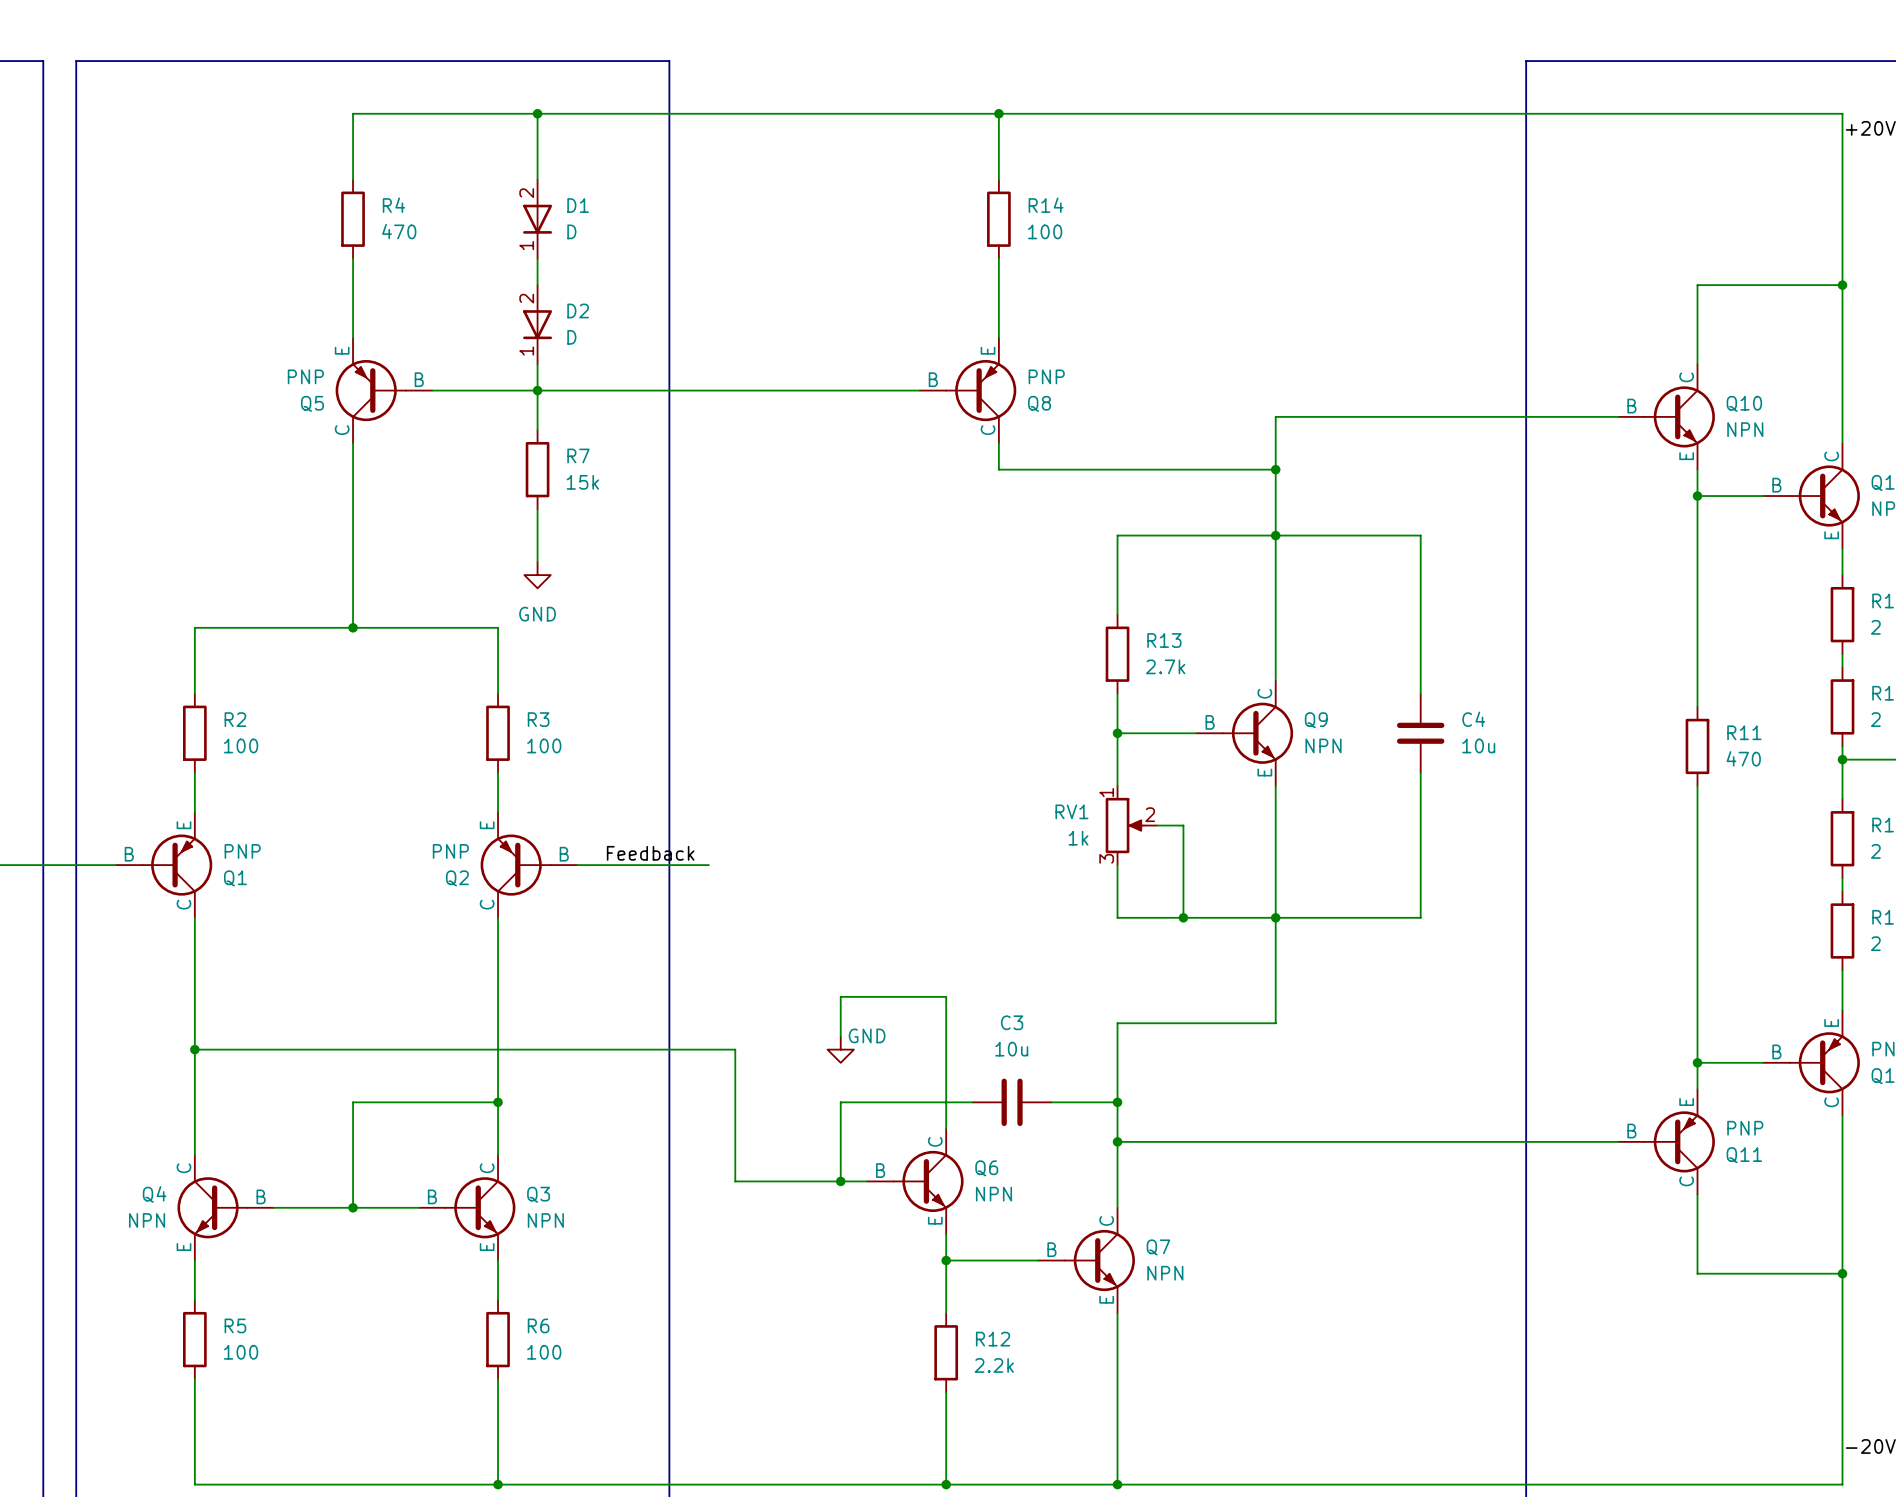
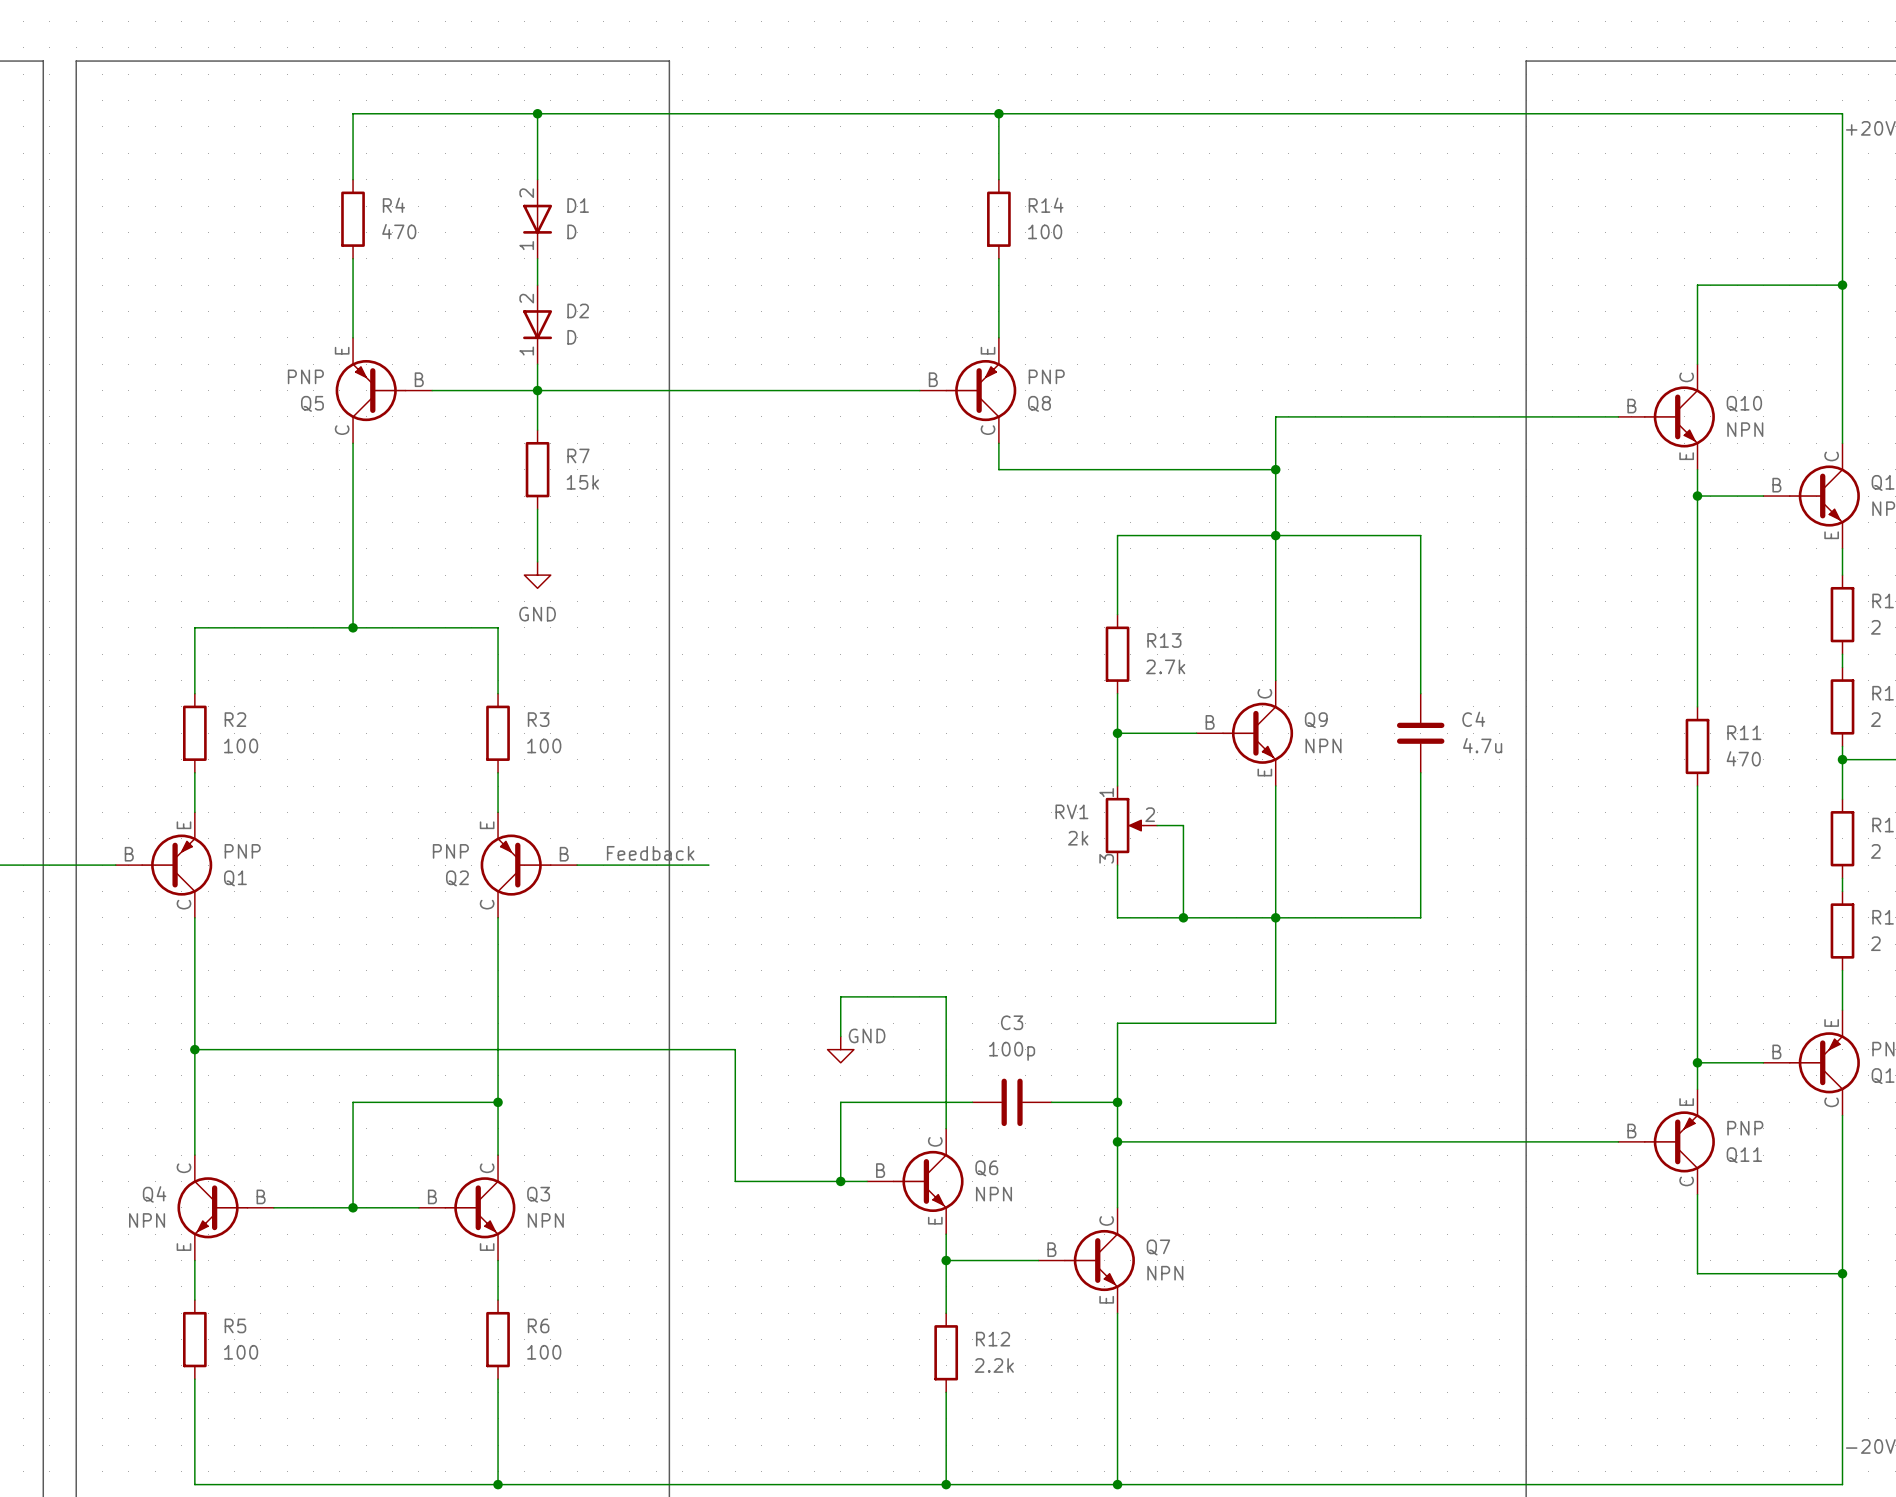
C4 value: 10u (1478, 745) -> 4.7u (1482, 745)
RV1 value: 1k (1078, 838) -> 2k (1078, 838)
C3 value: 10u (1011, 1049) -> 100p (1012, 1051)

